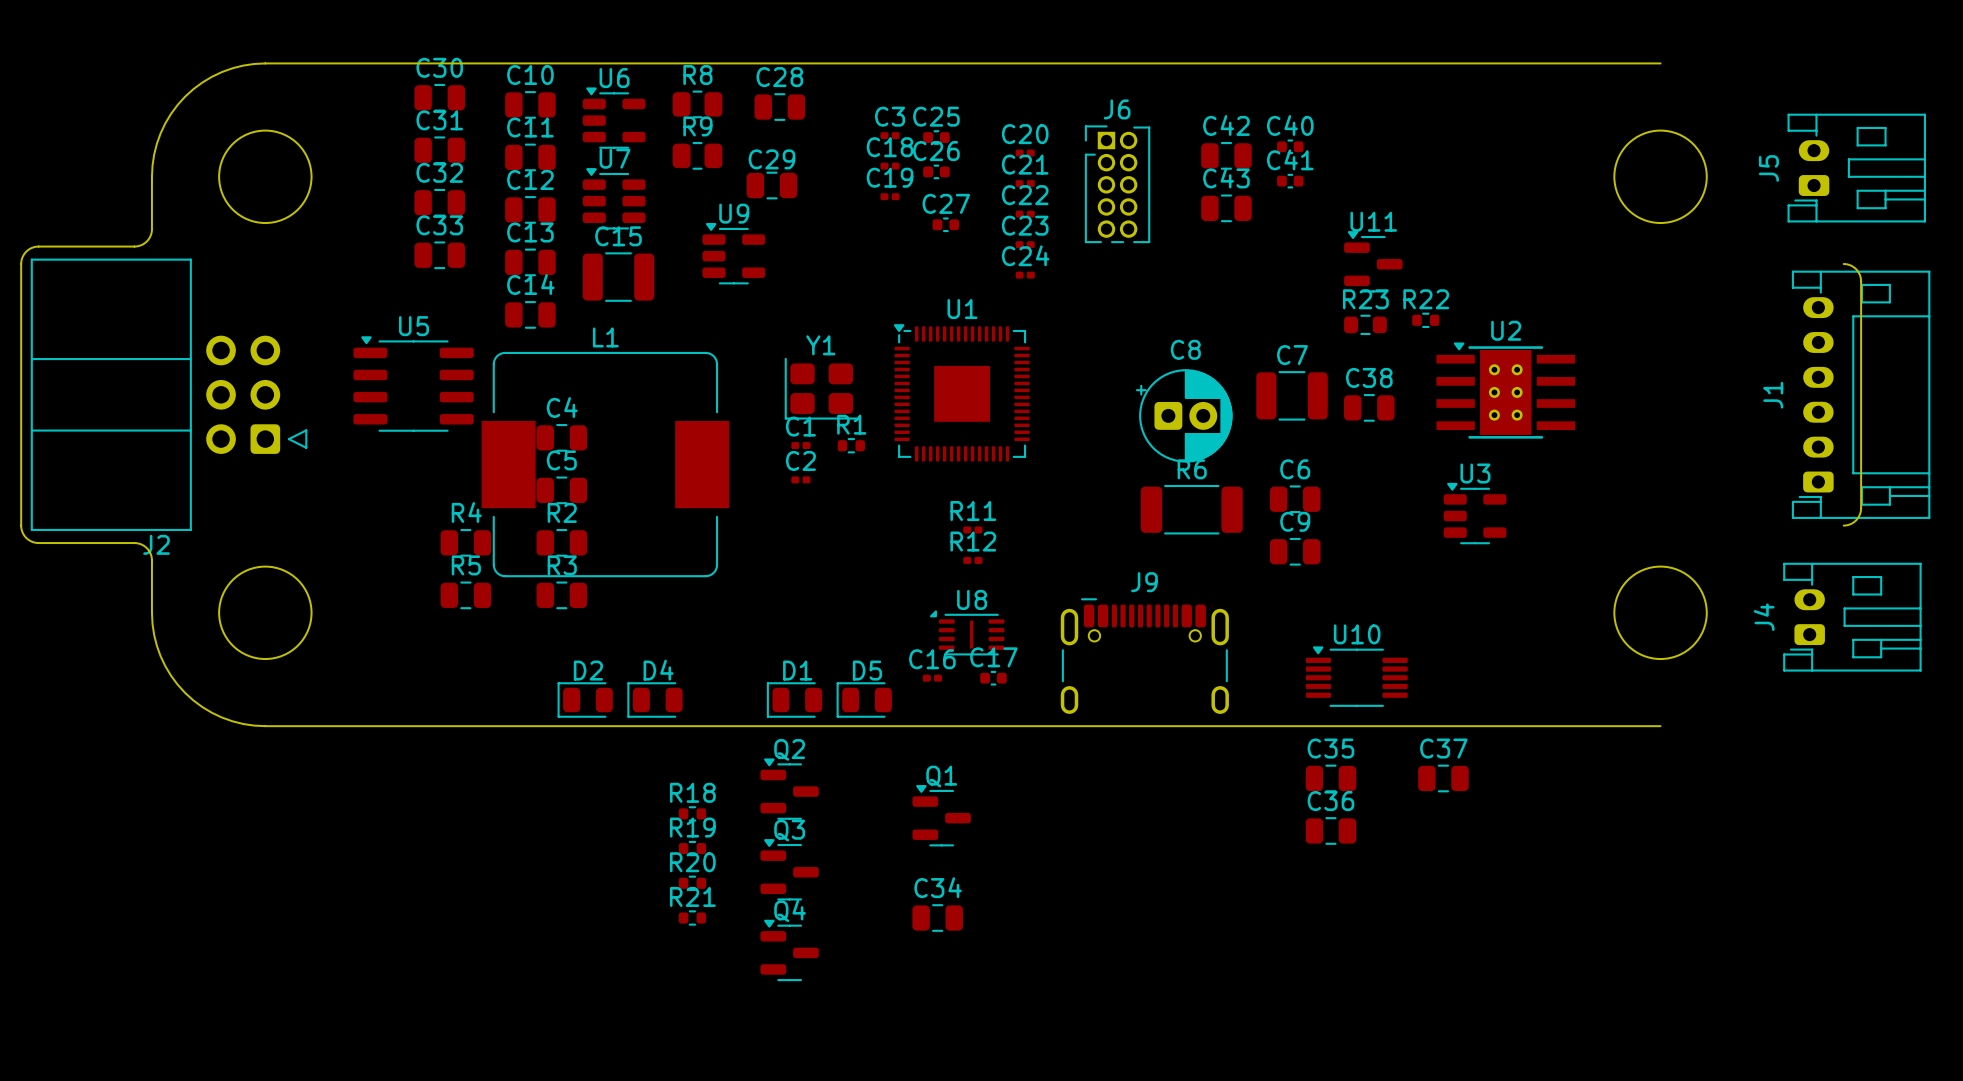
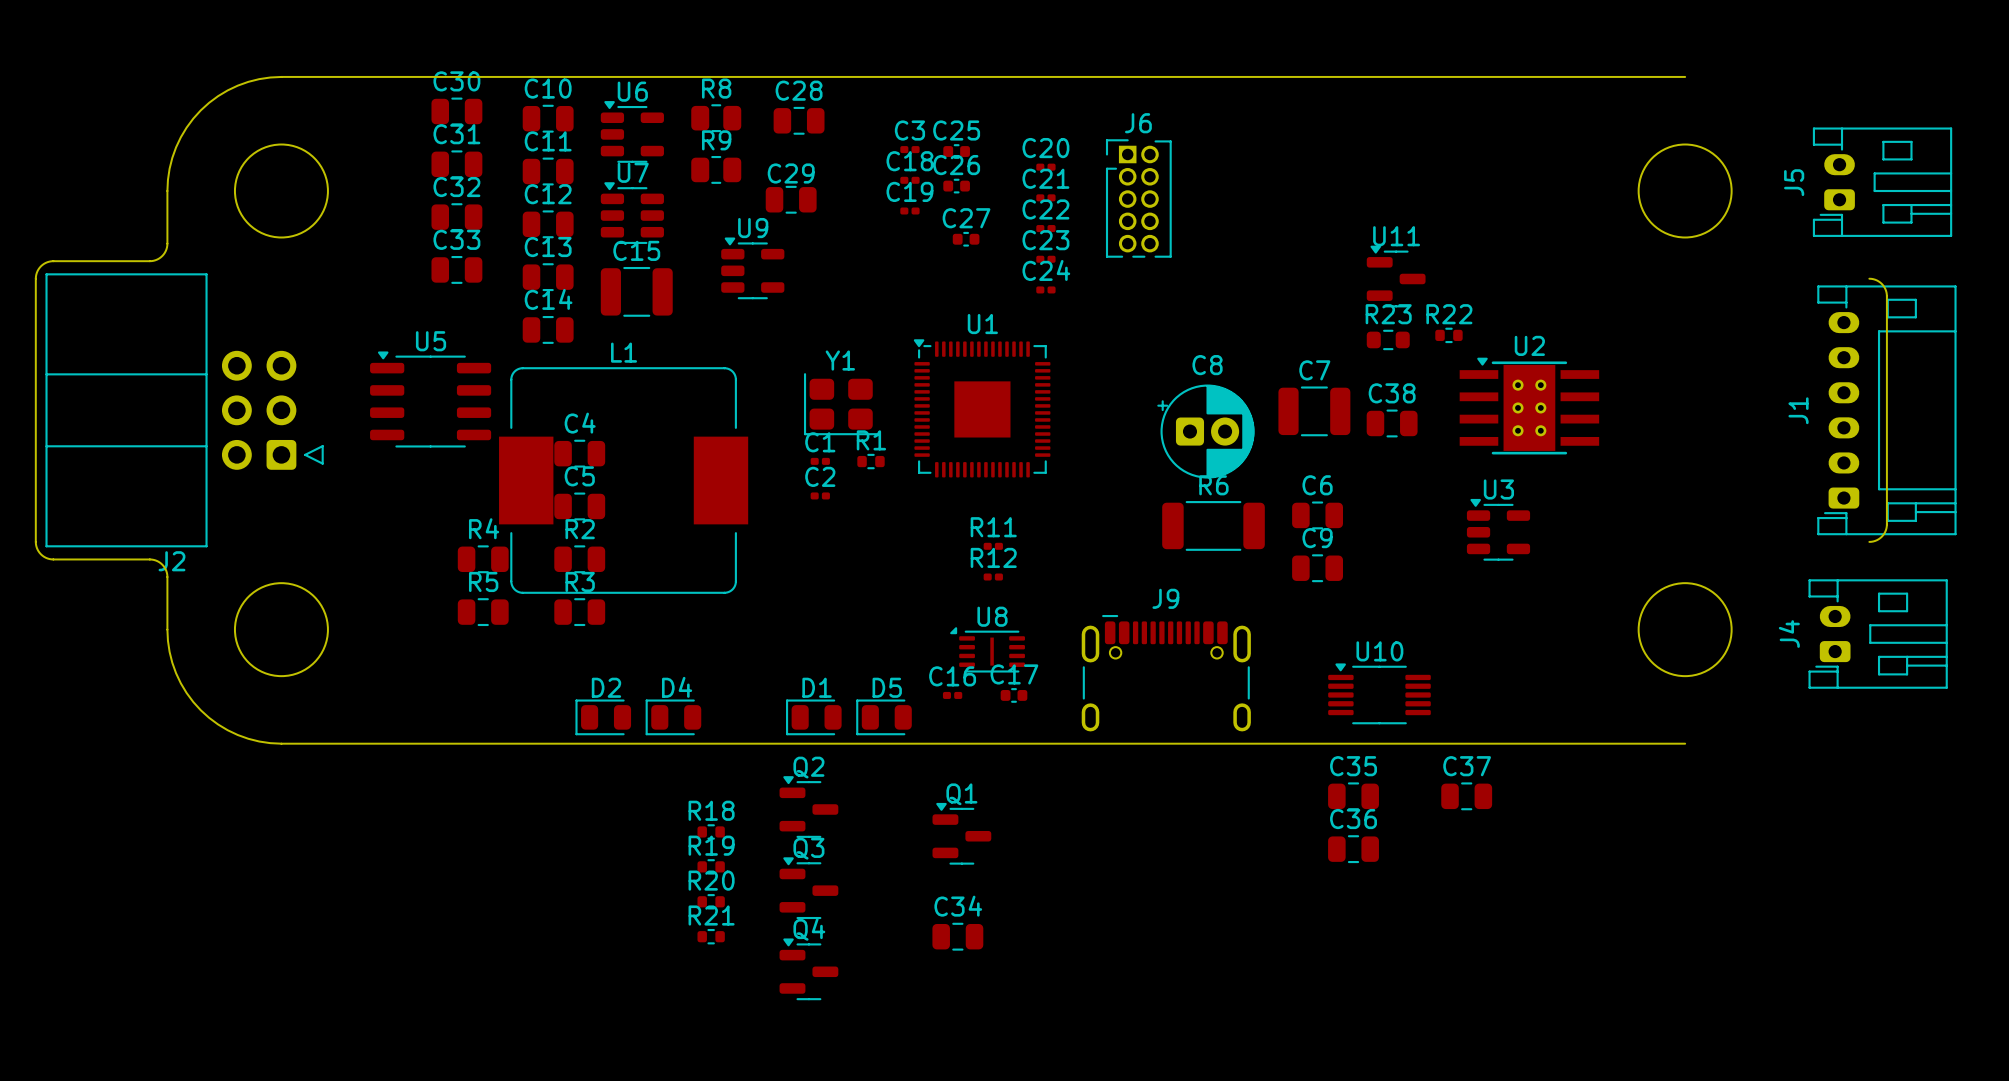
C40: (1290, 146) -> none
C42: (1226, 155) -> none
C41: (1290, 181) -> none
C43: (1226, 208) -> none

